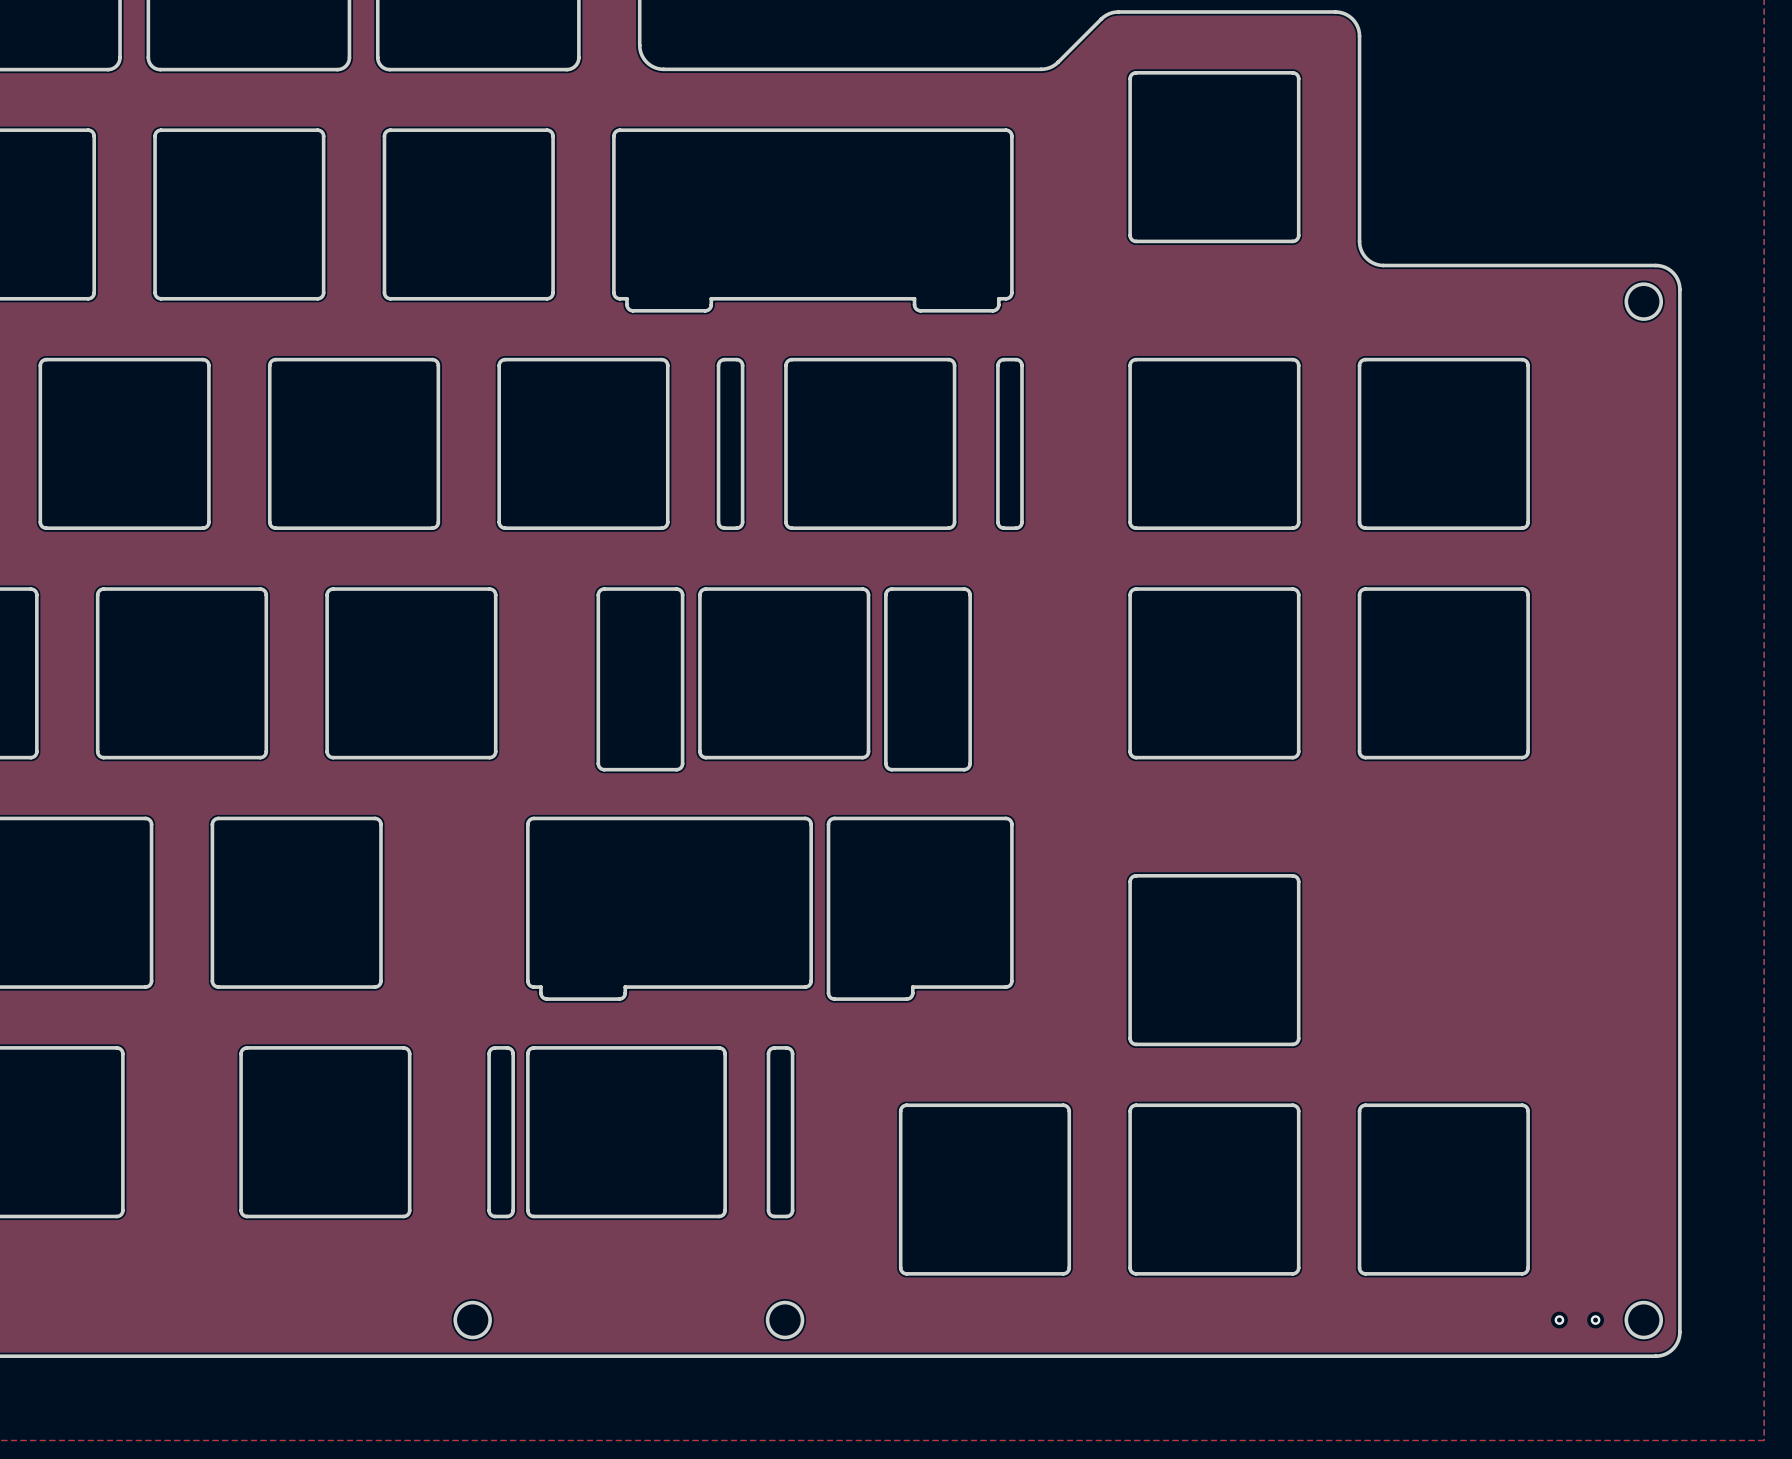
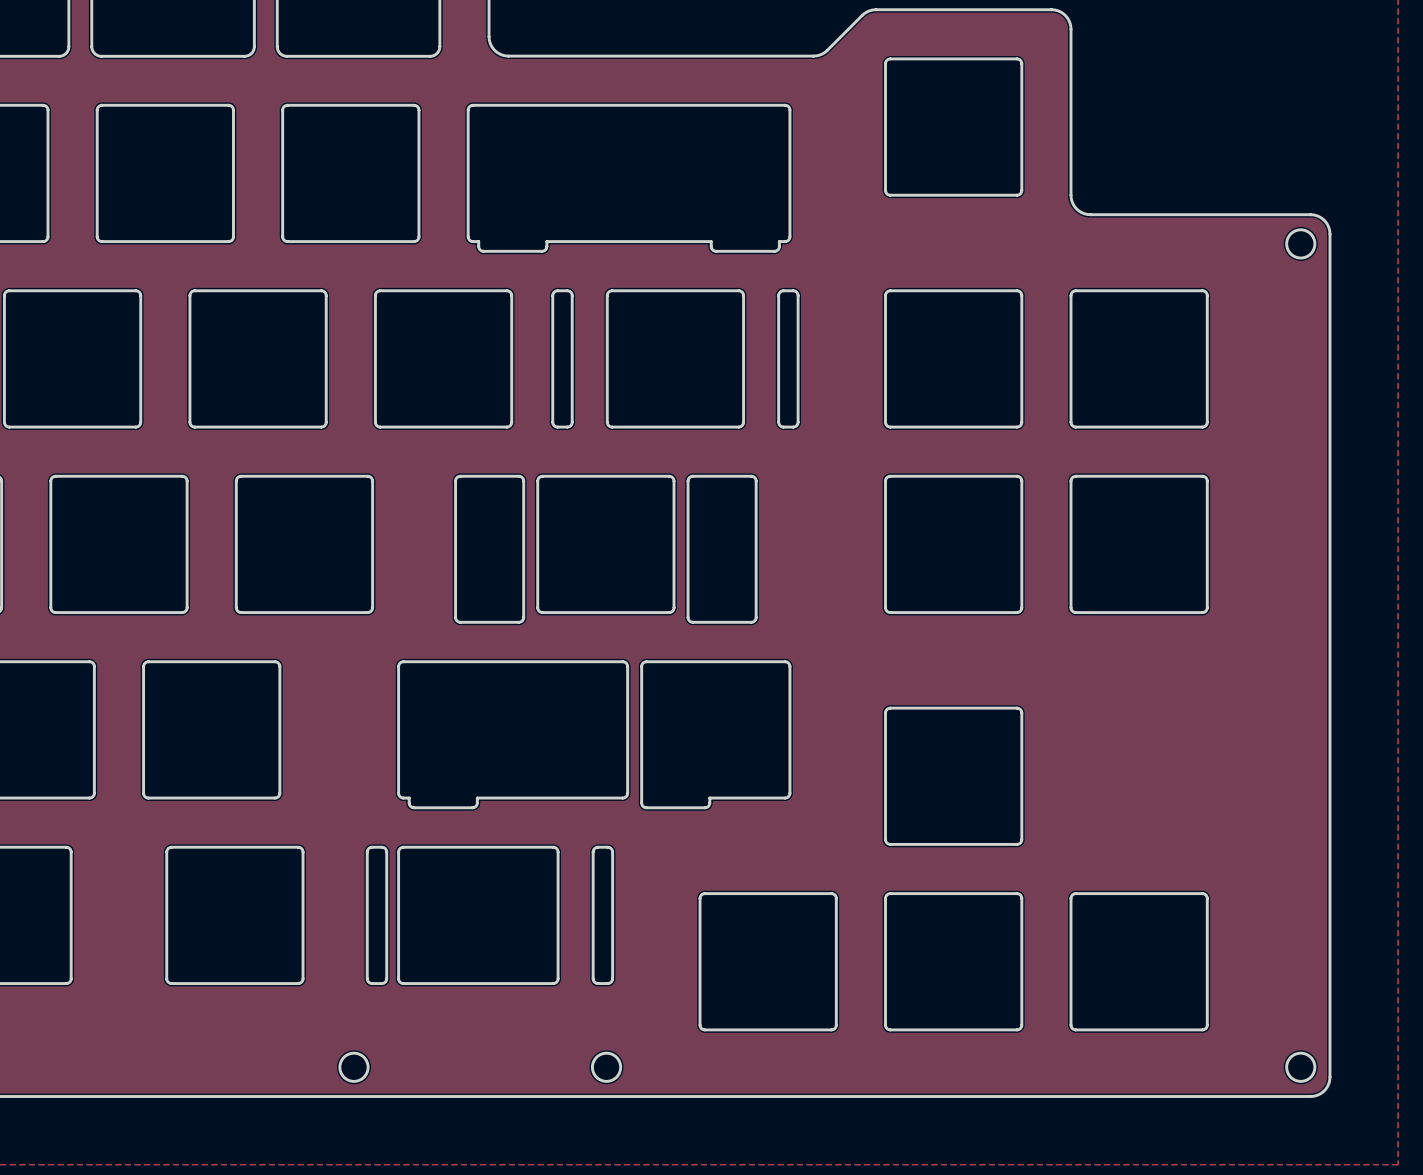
via: (1559, 1320) -> none
via: (1595, 1320) -> none

